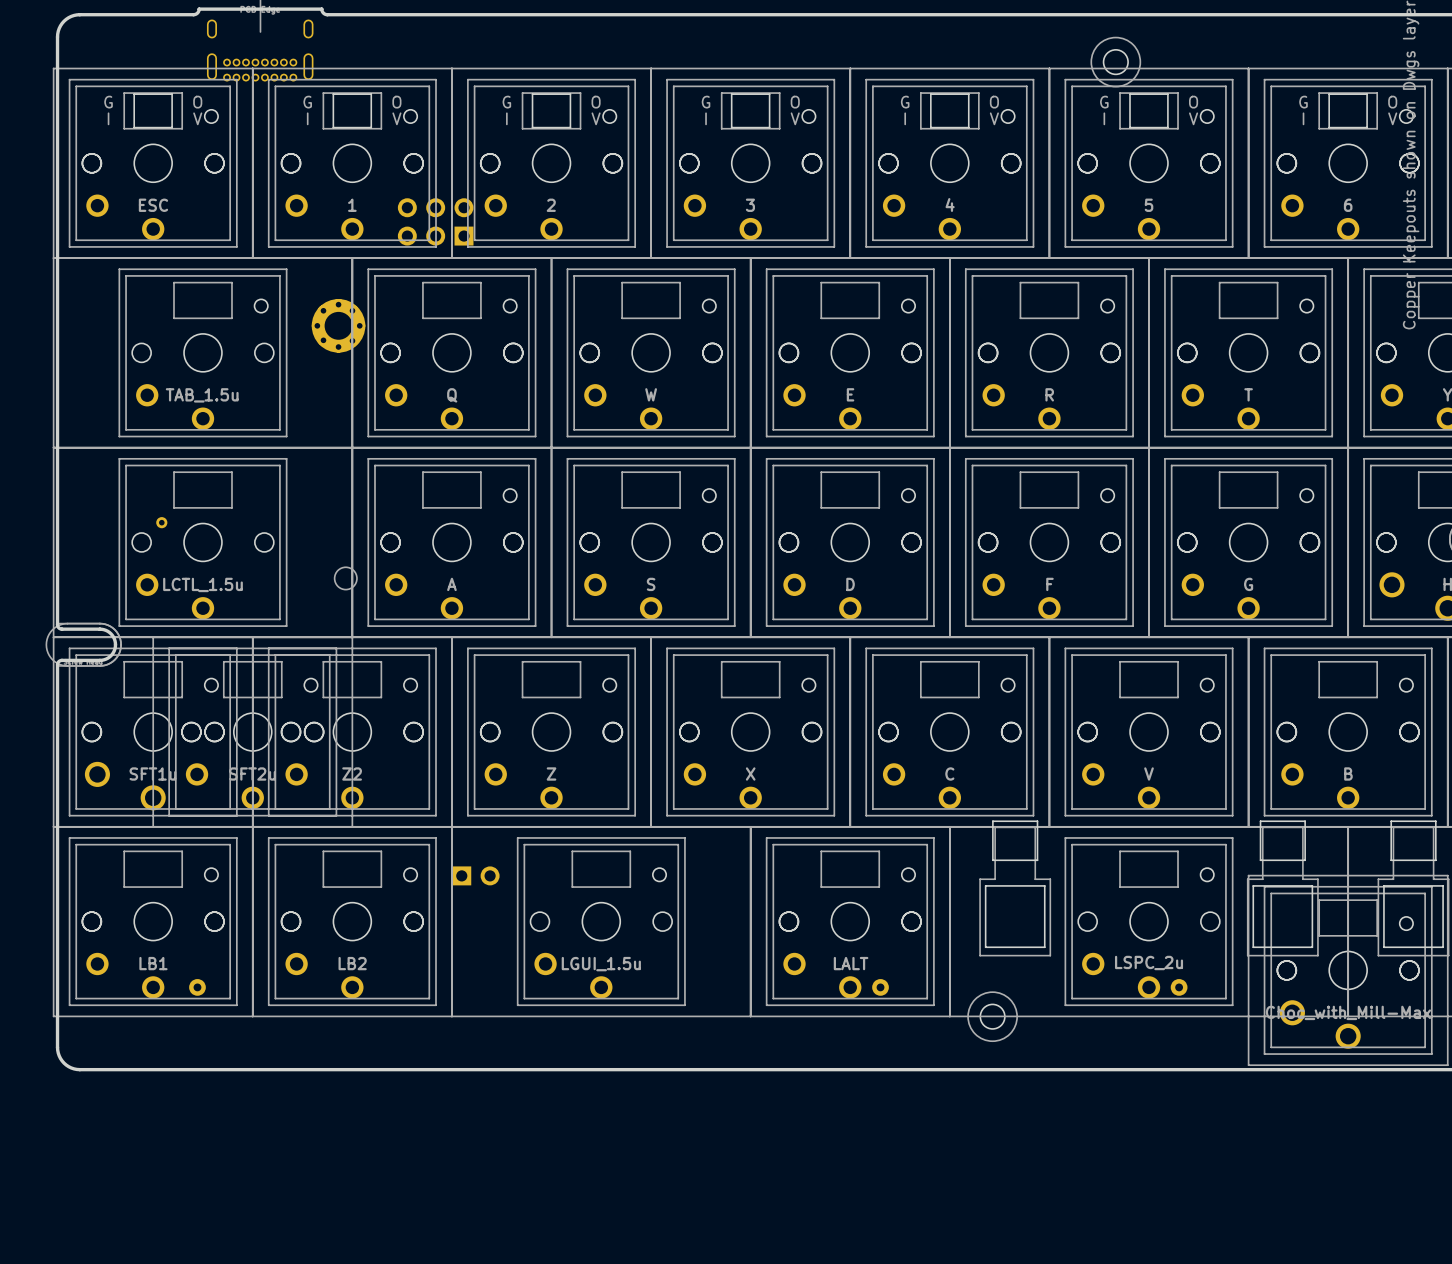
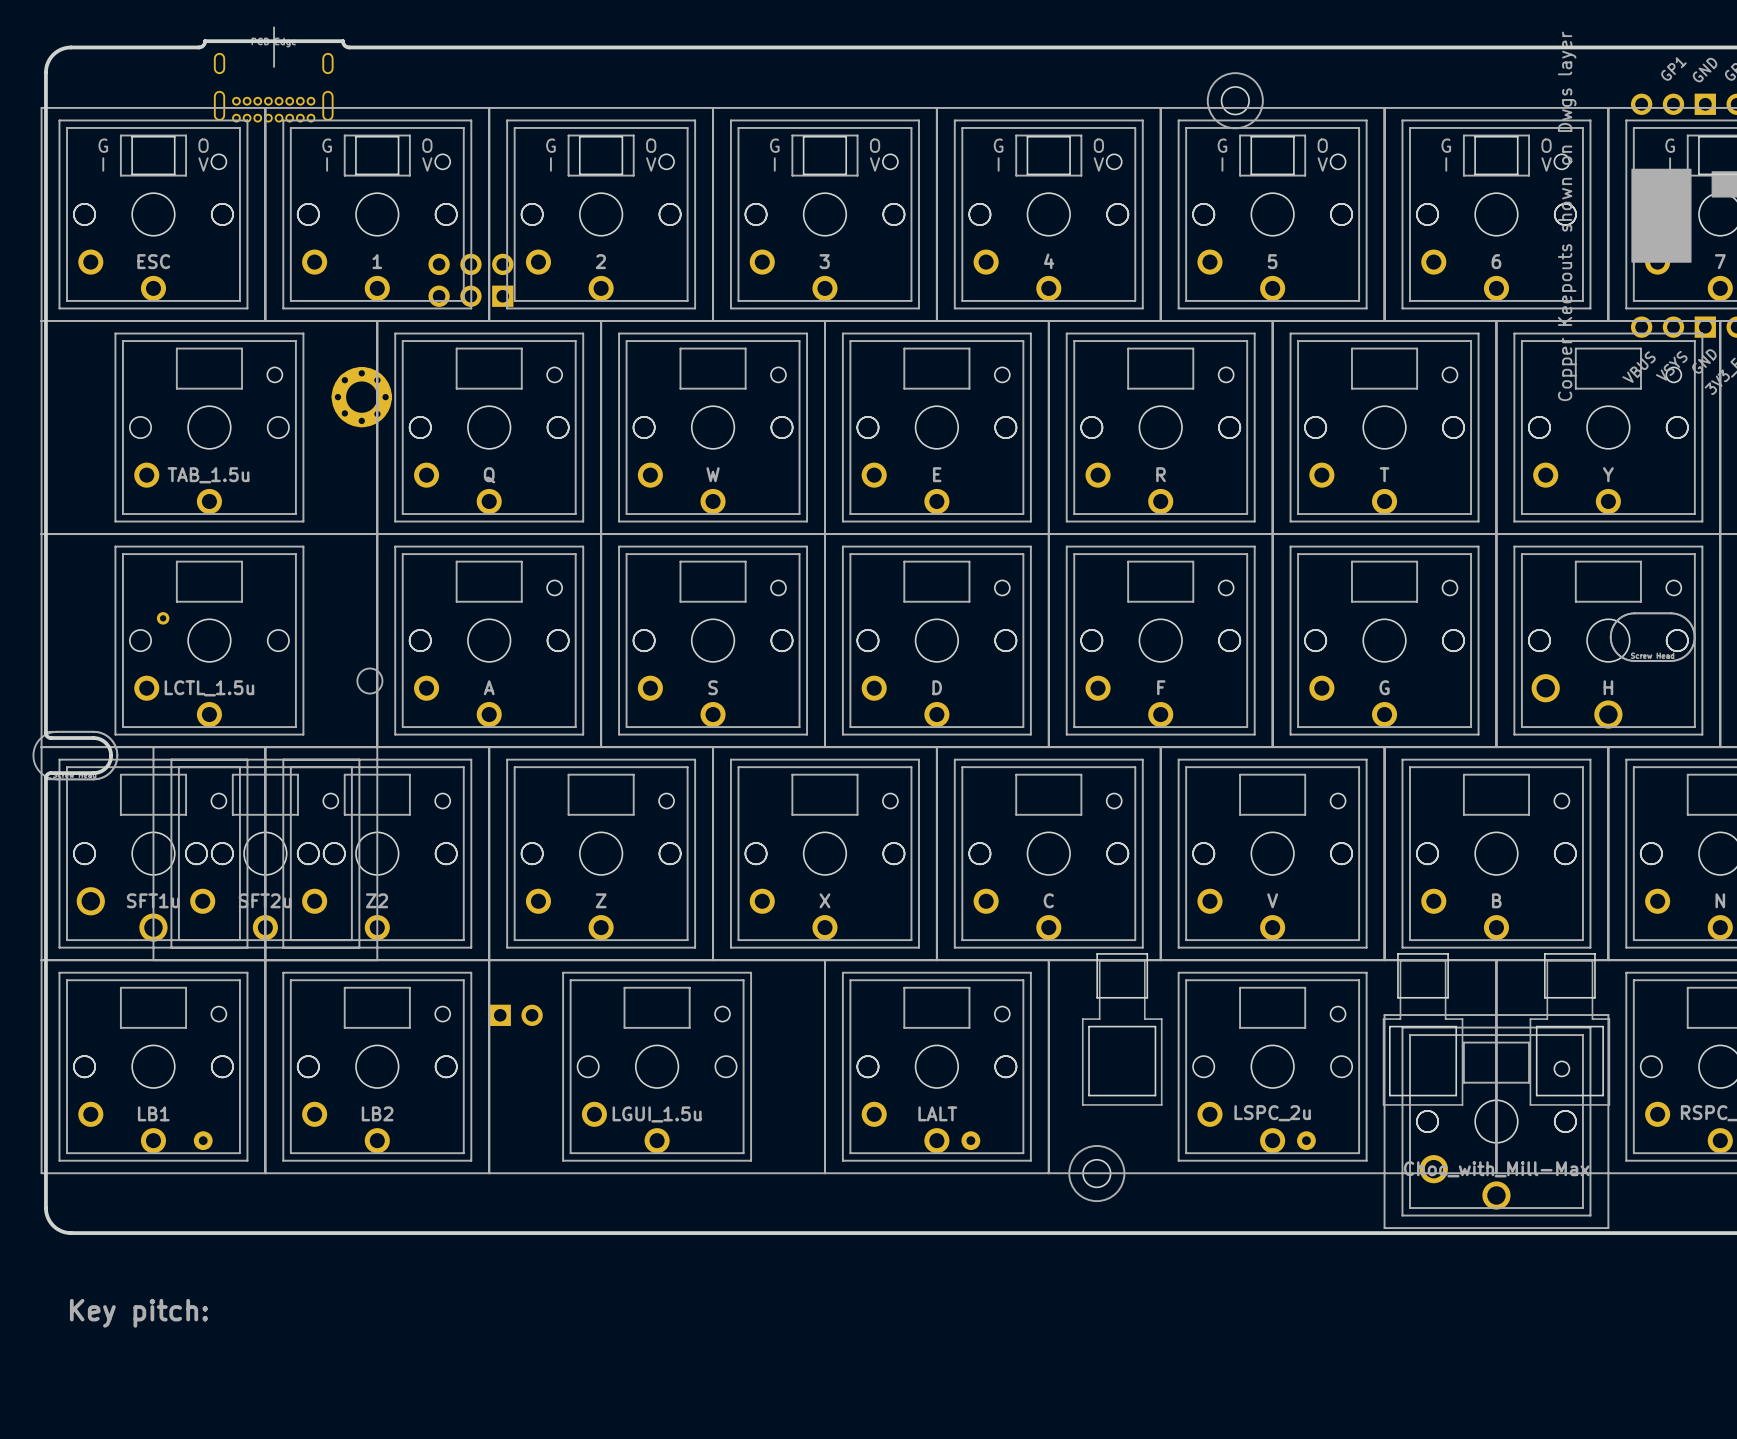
text: none -> Key pitch: (138, 1313)

